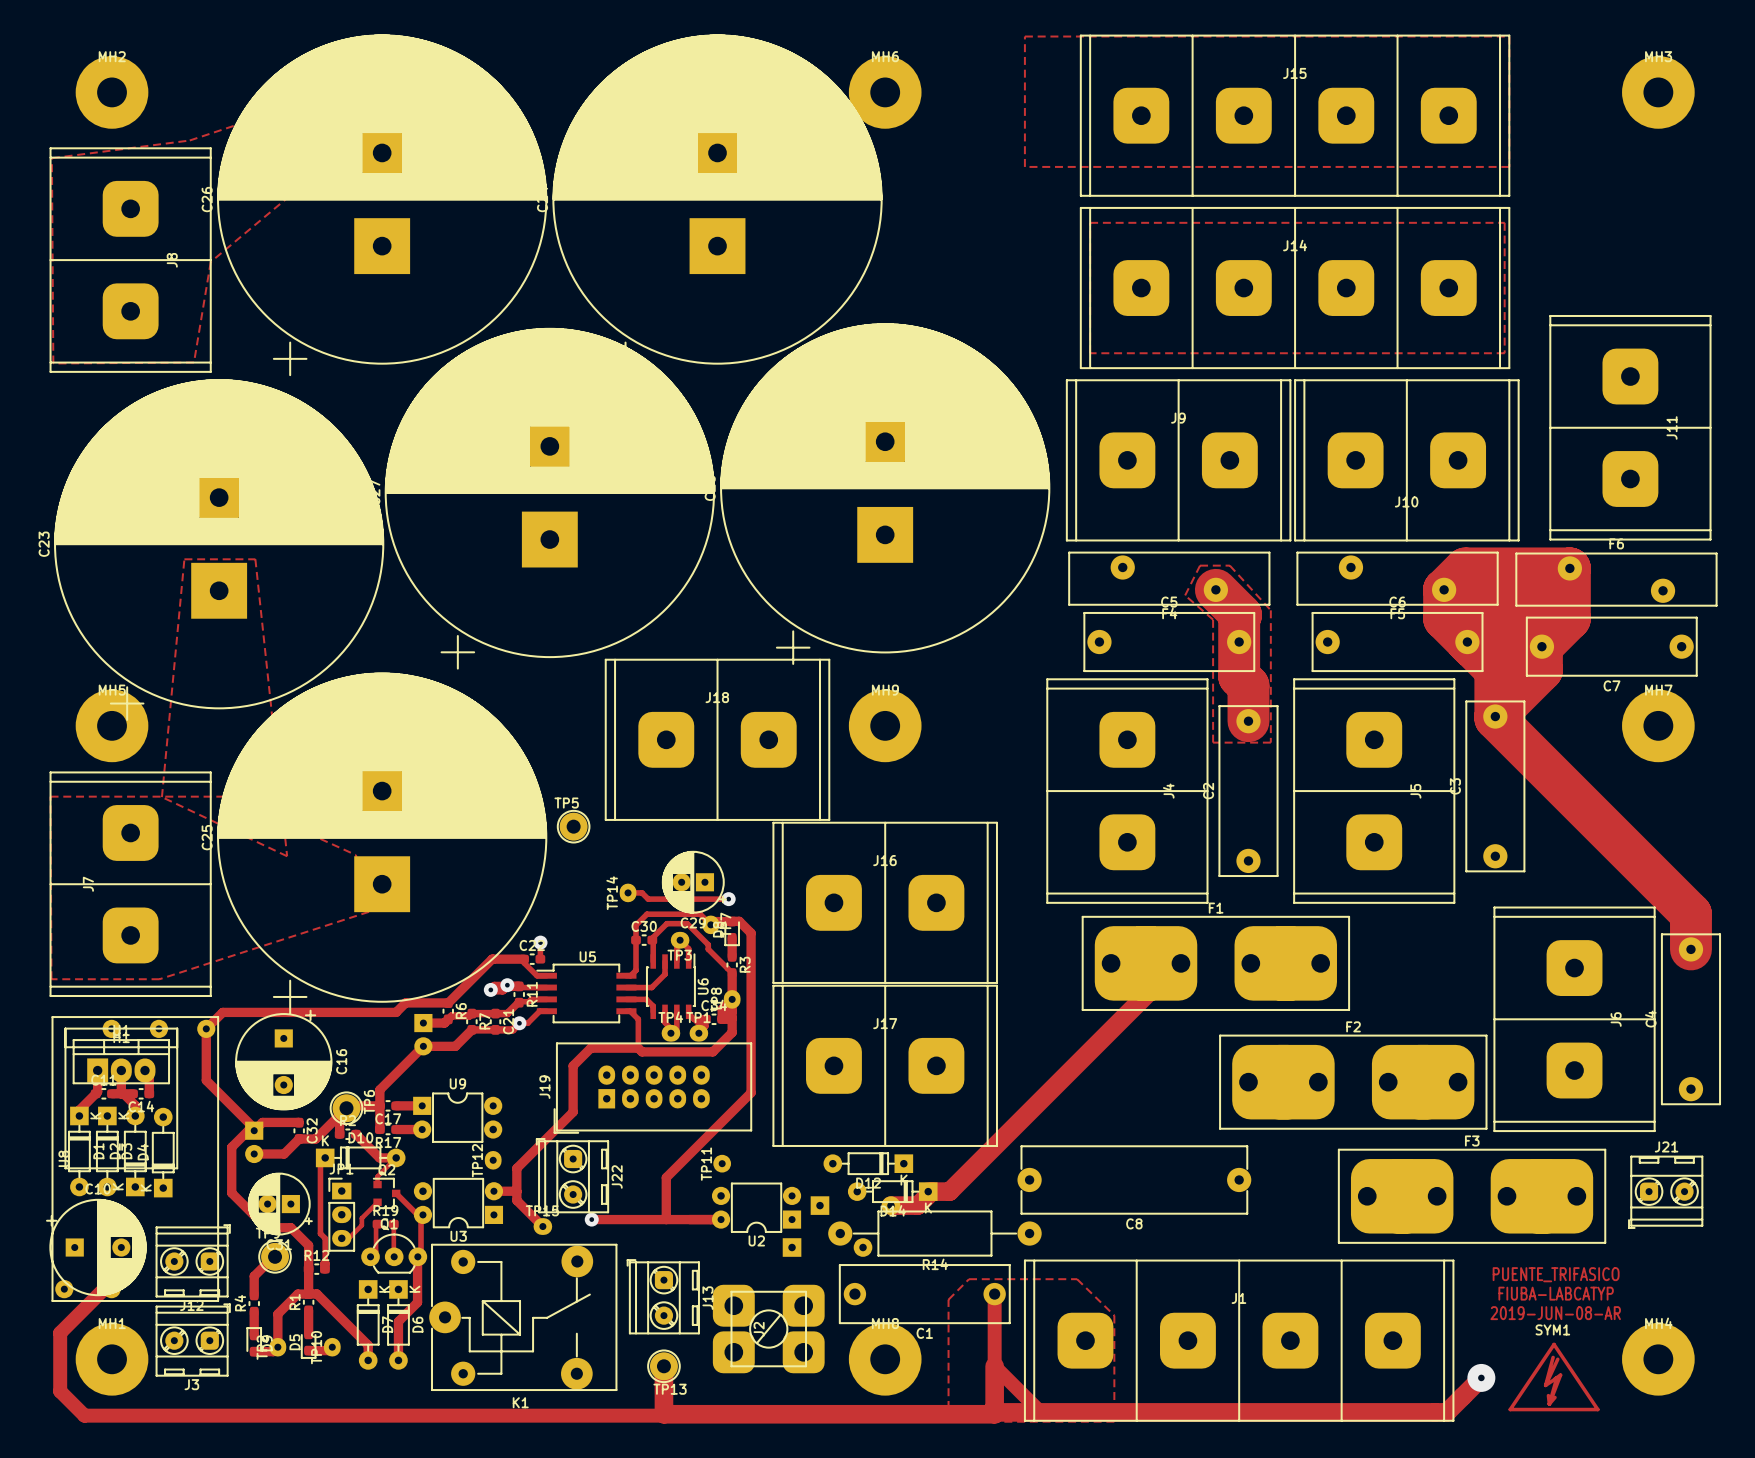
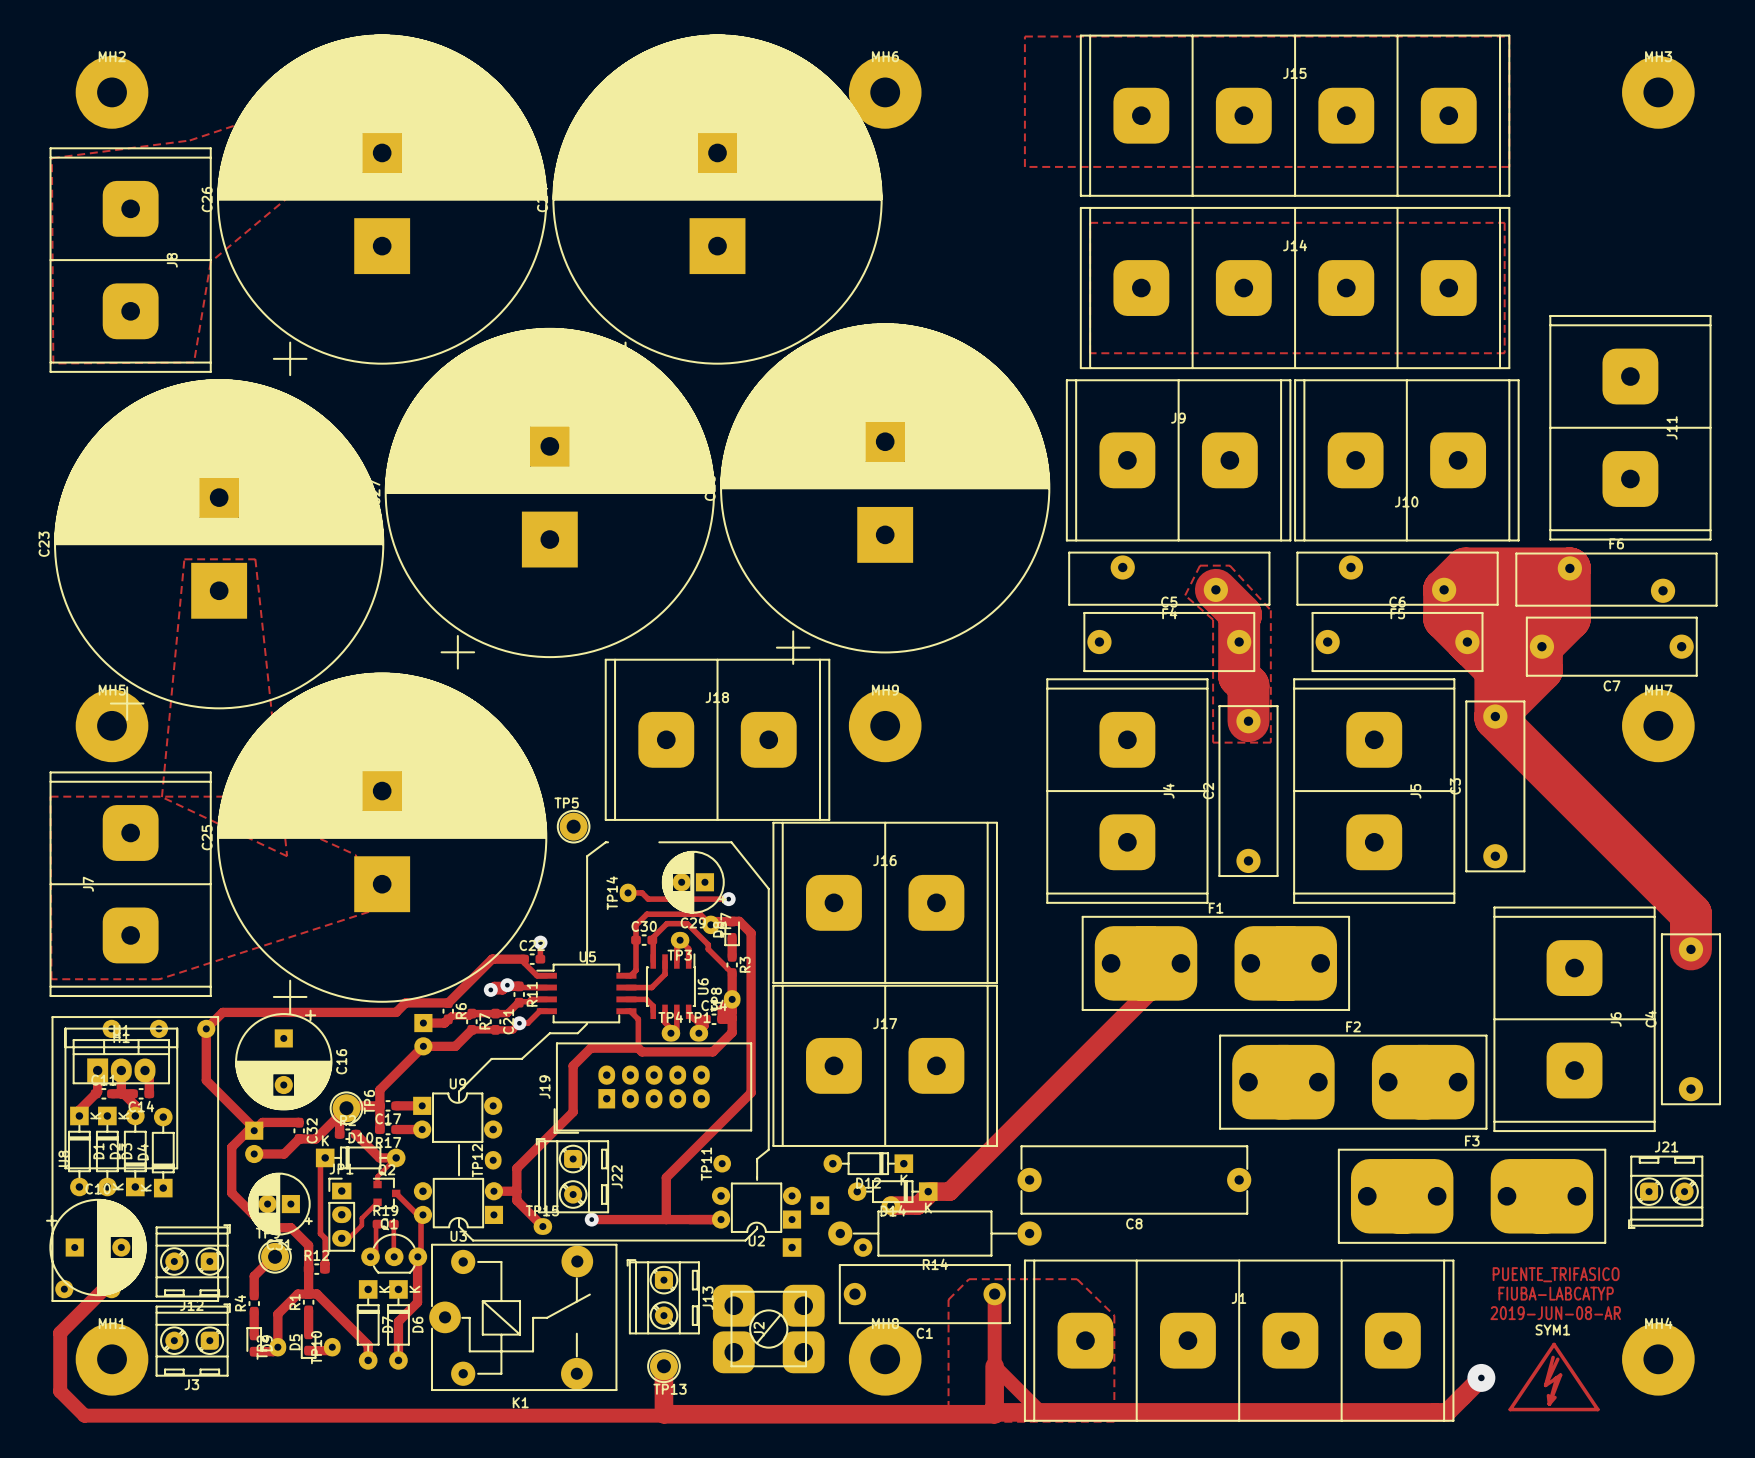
line: none -> (608, 842) (587, 856) (587, 963)
line: none -> (659, 842) (731, 842) (768, 888) (768, 1149) (757, 1159) (757, 1179)
line: none -> (587, 1023) (577, 1033) (549, 1033) (521, 1058) (491, 1058) (459, 1091) (459, 1100)
line: none -> (459, 1145) (459, 1175)
line: none -> (459, 1219) (459, 1226) (472, 1240) (745, 1240) (757, 1226)

